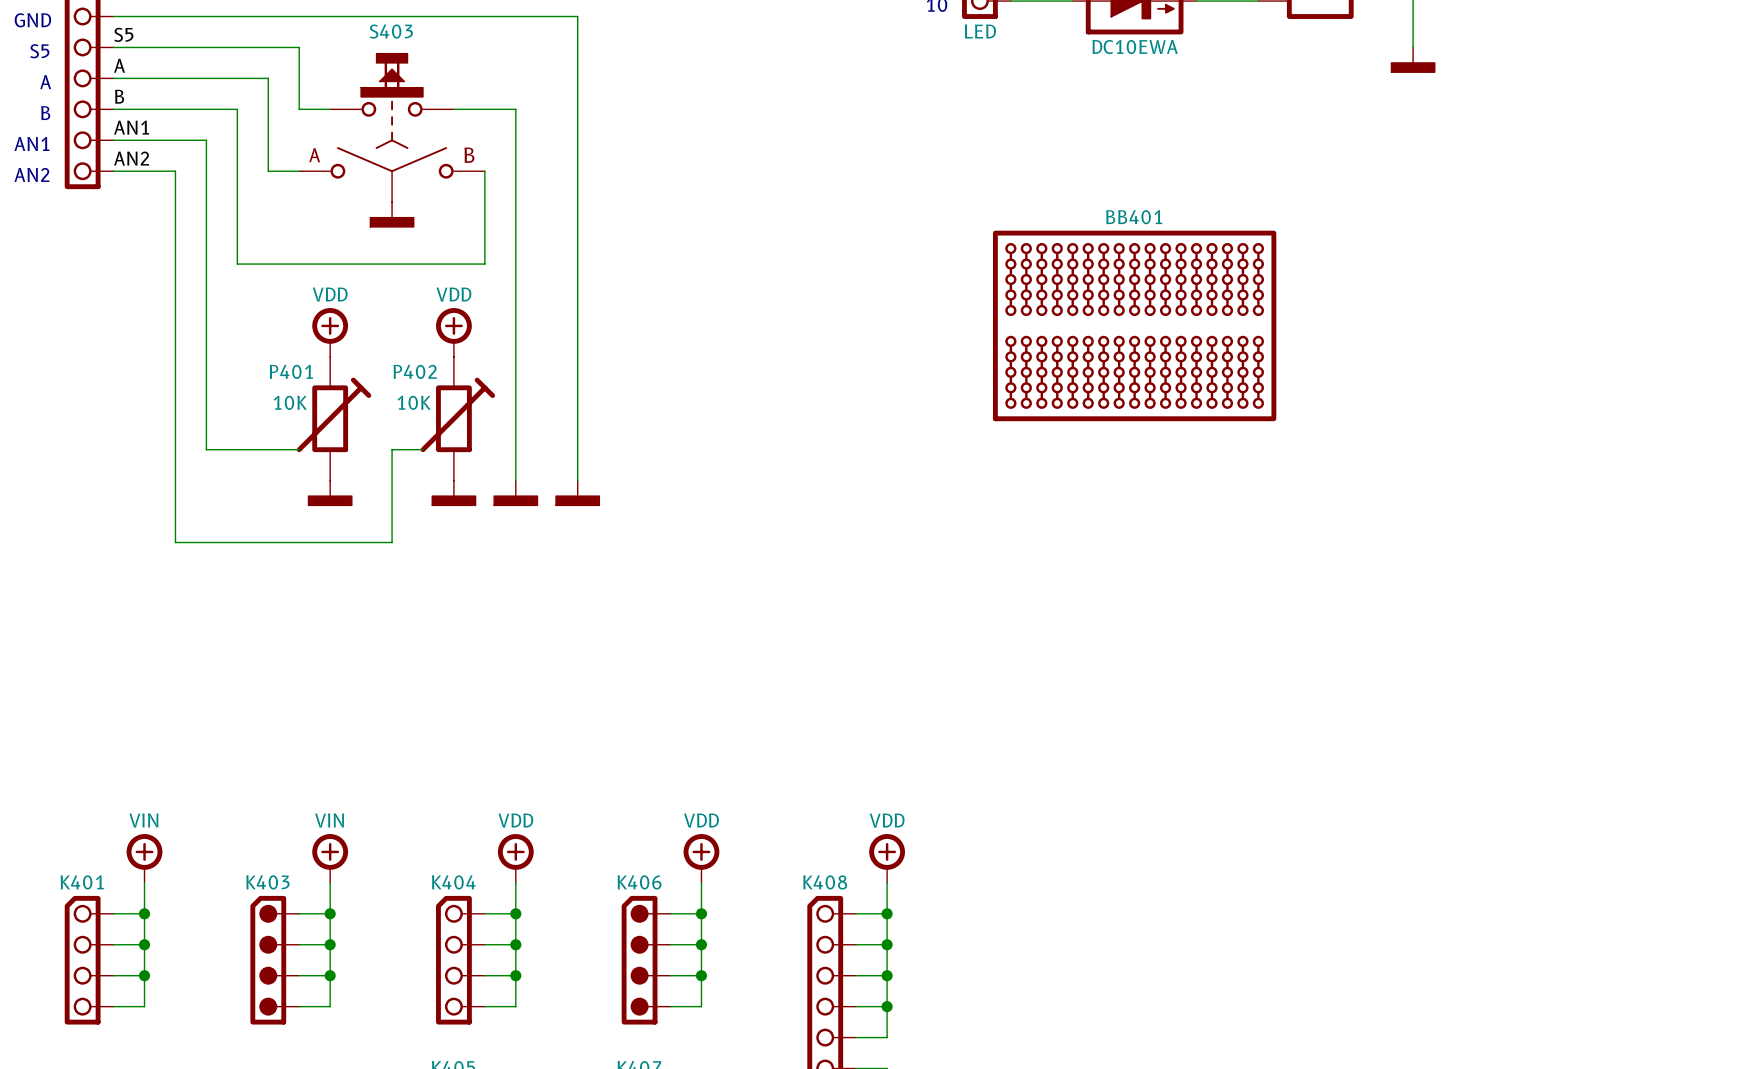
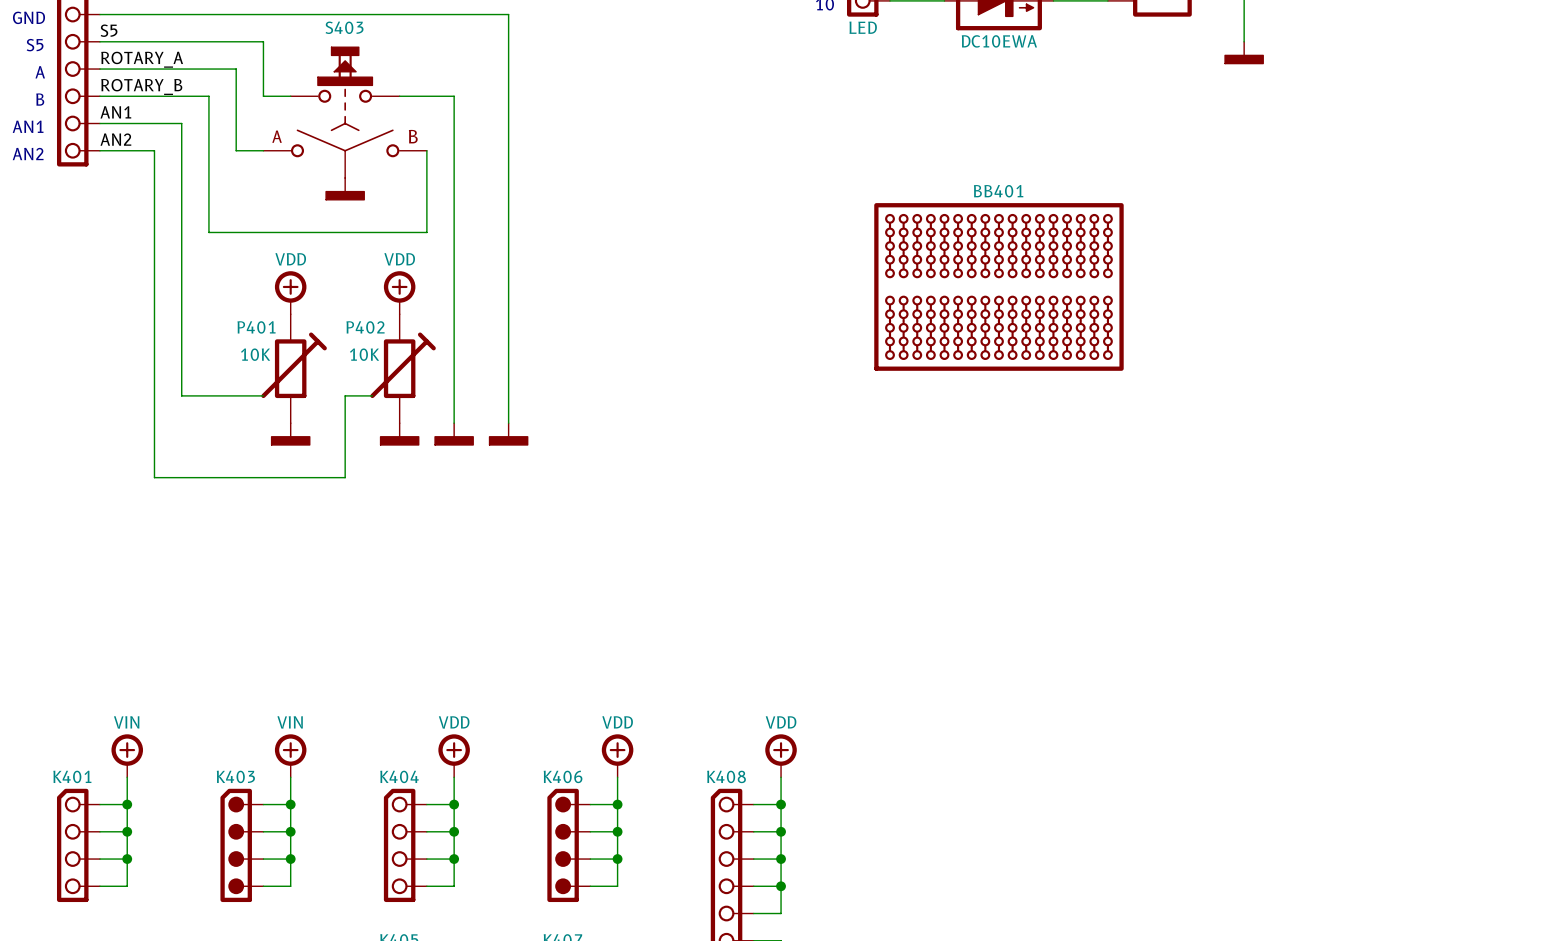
label: A (119, 65) -> ROTARY_A (142, 59)
label: B (119, 96) -> ROTARY_B (141, 86)

